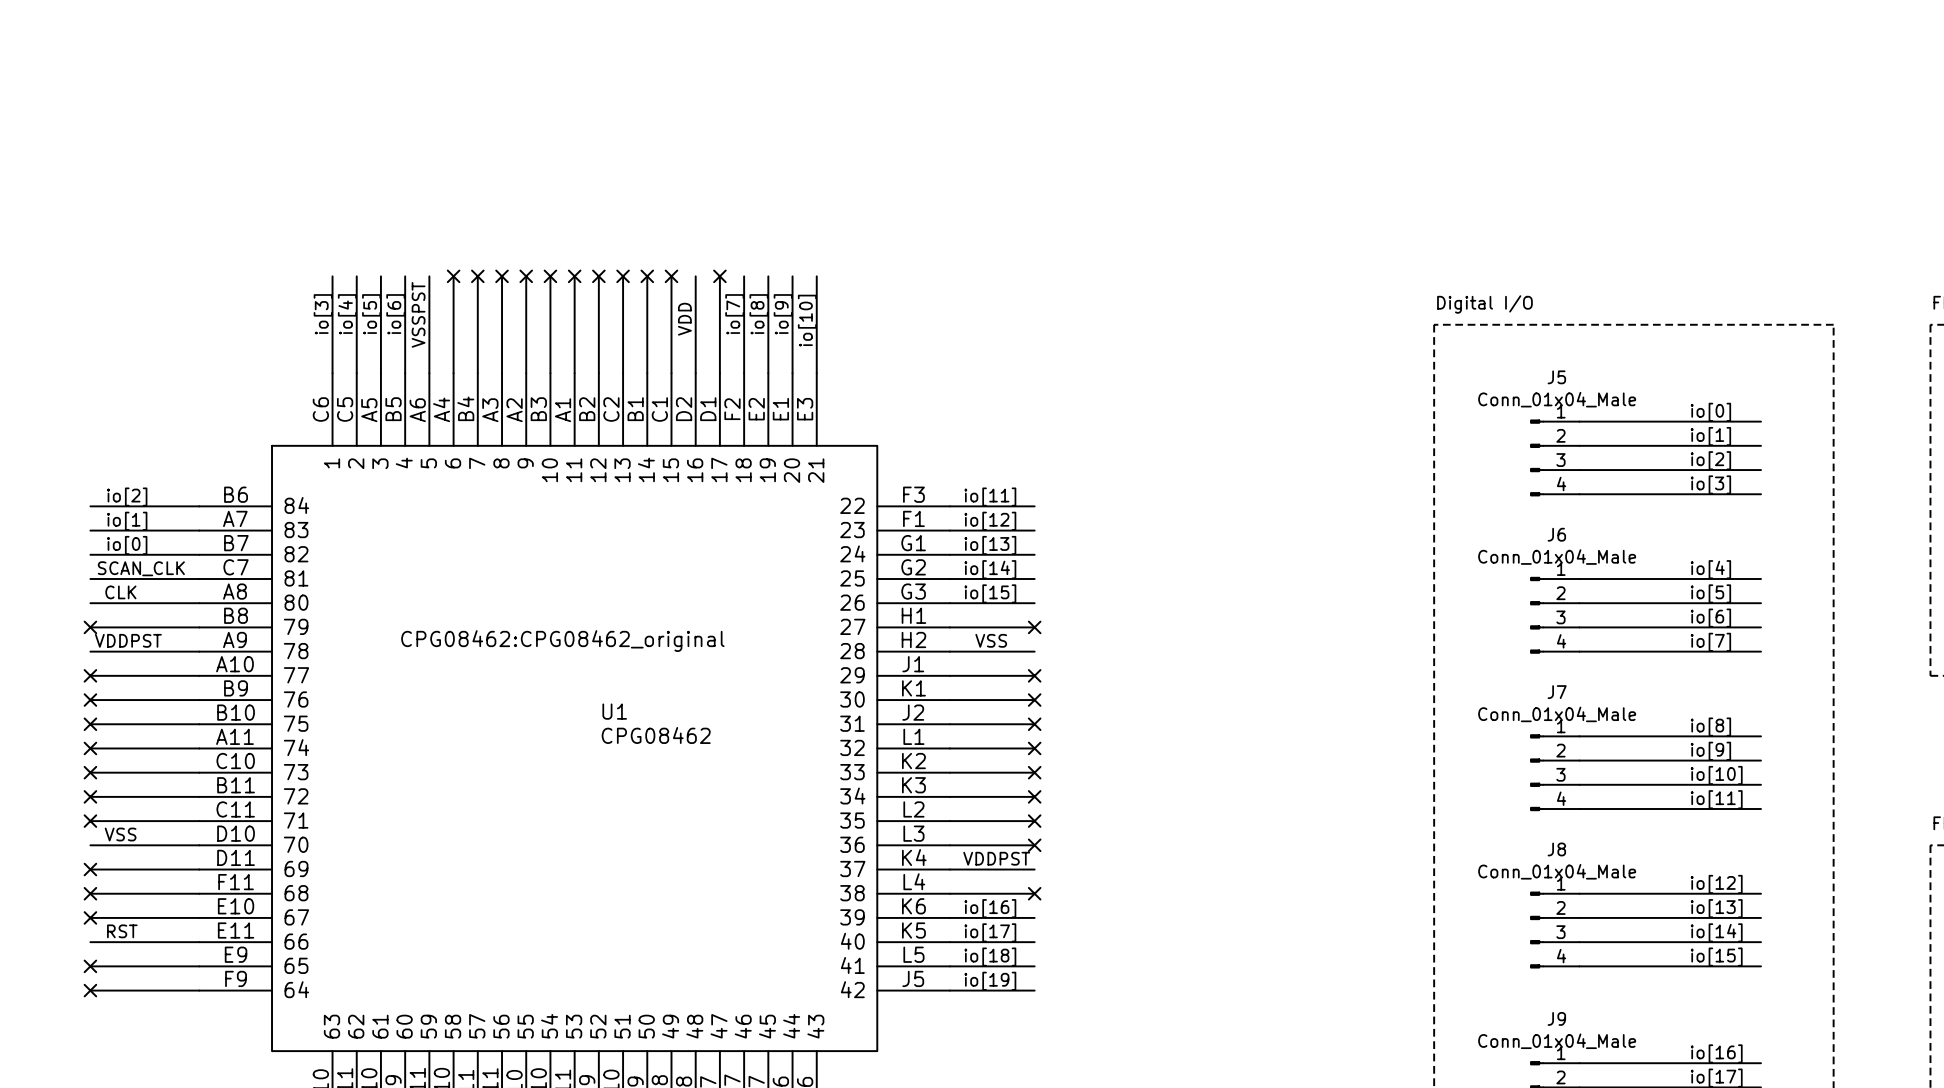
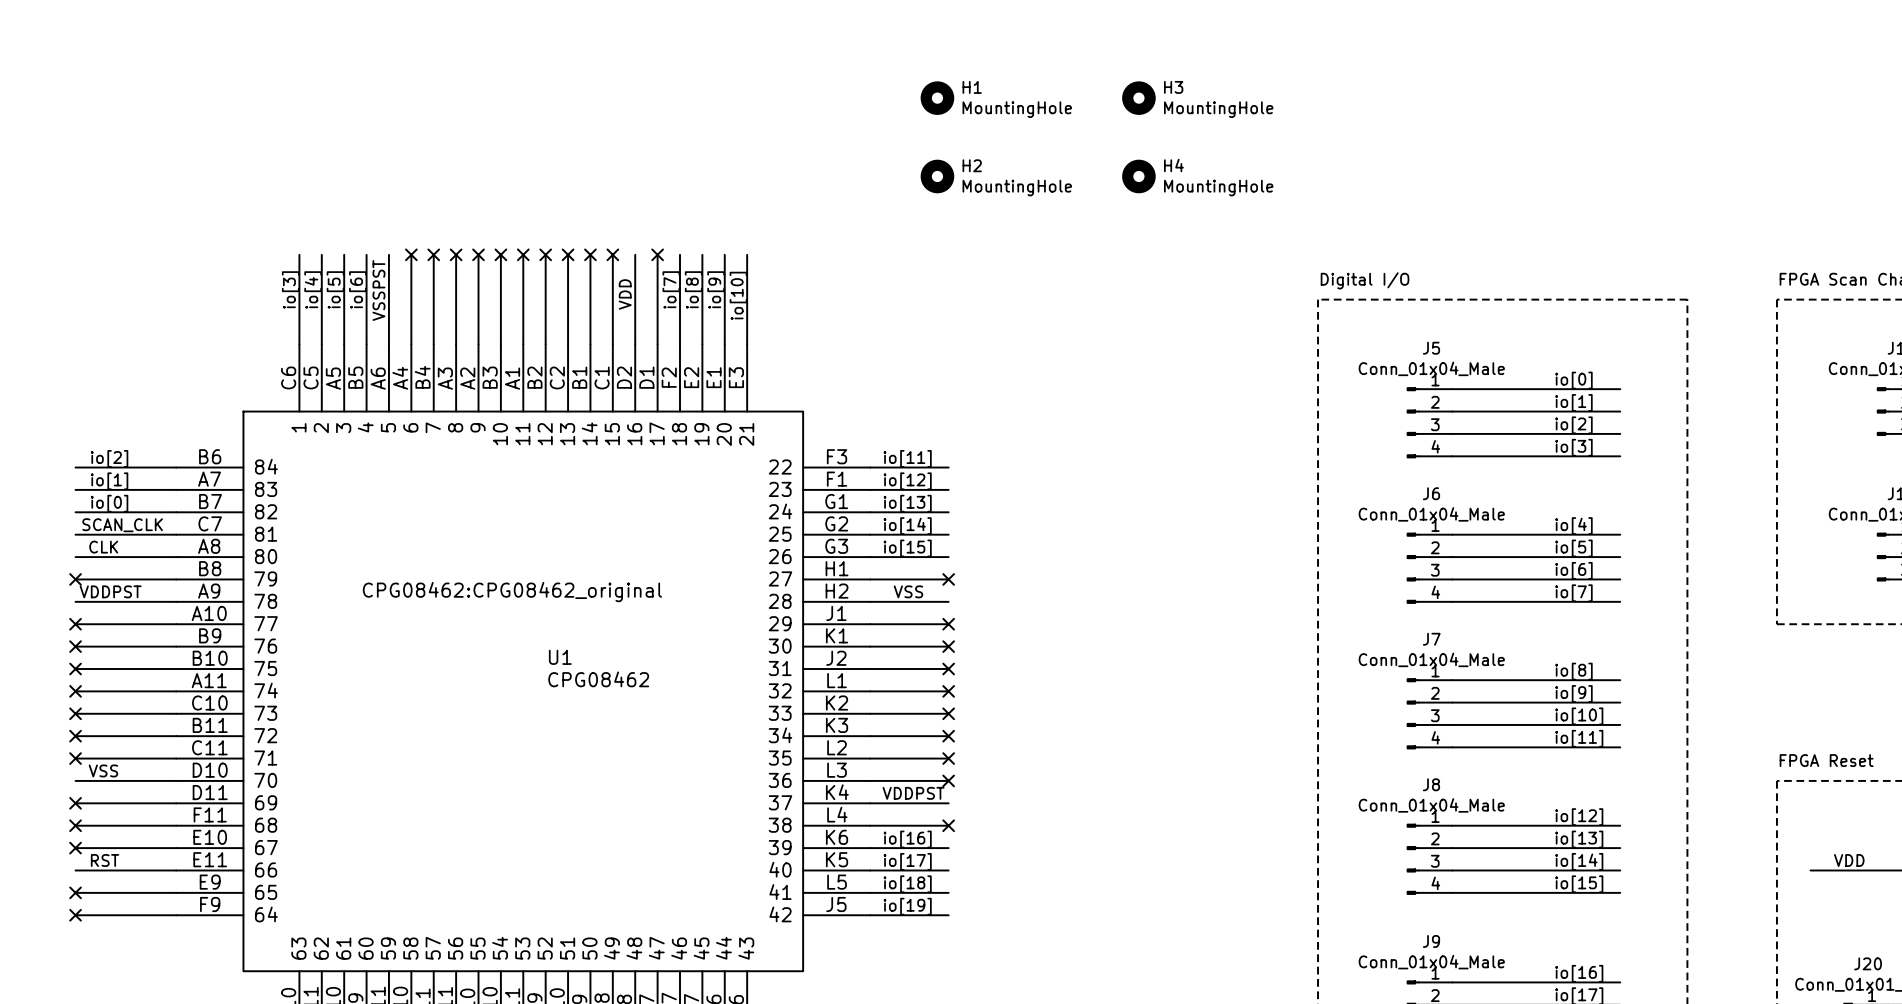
H1: none -> MountingHole (937, 98)
H3: none -> MountingHole (1138, 98)
H2: none -> MountingHole (937, 176)
H4: none -> MountingHole (1138, 176)

